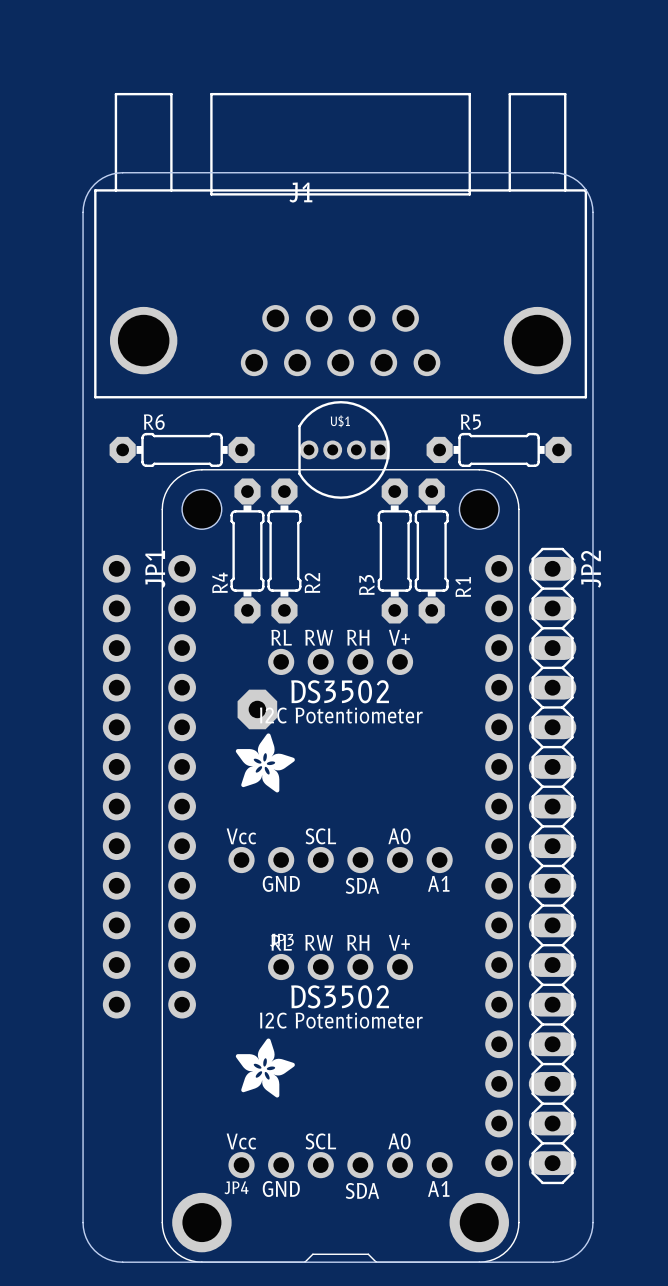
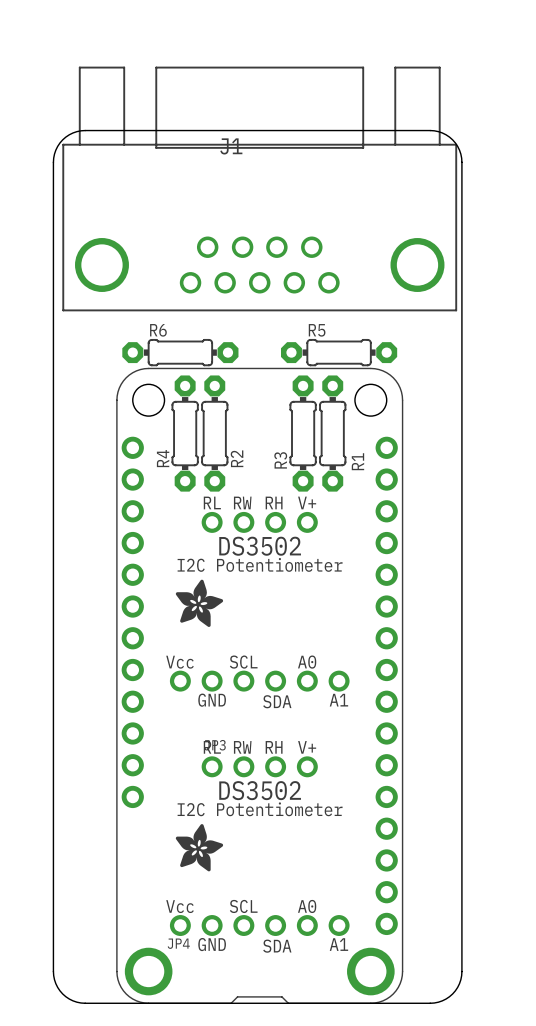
R6 position: (182, 449) -> (180, 352)
U$1: (344, 449) -> none
R5 position: (499, 449) -> (339, 352)
part: (257, 709) -> none
JP1: (116, 786) -> none
JP2: (552, 865) -> none

